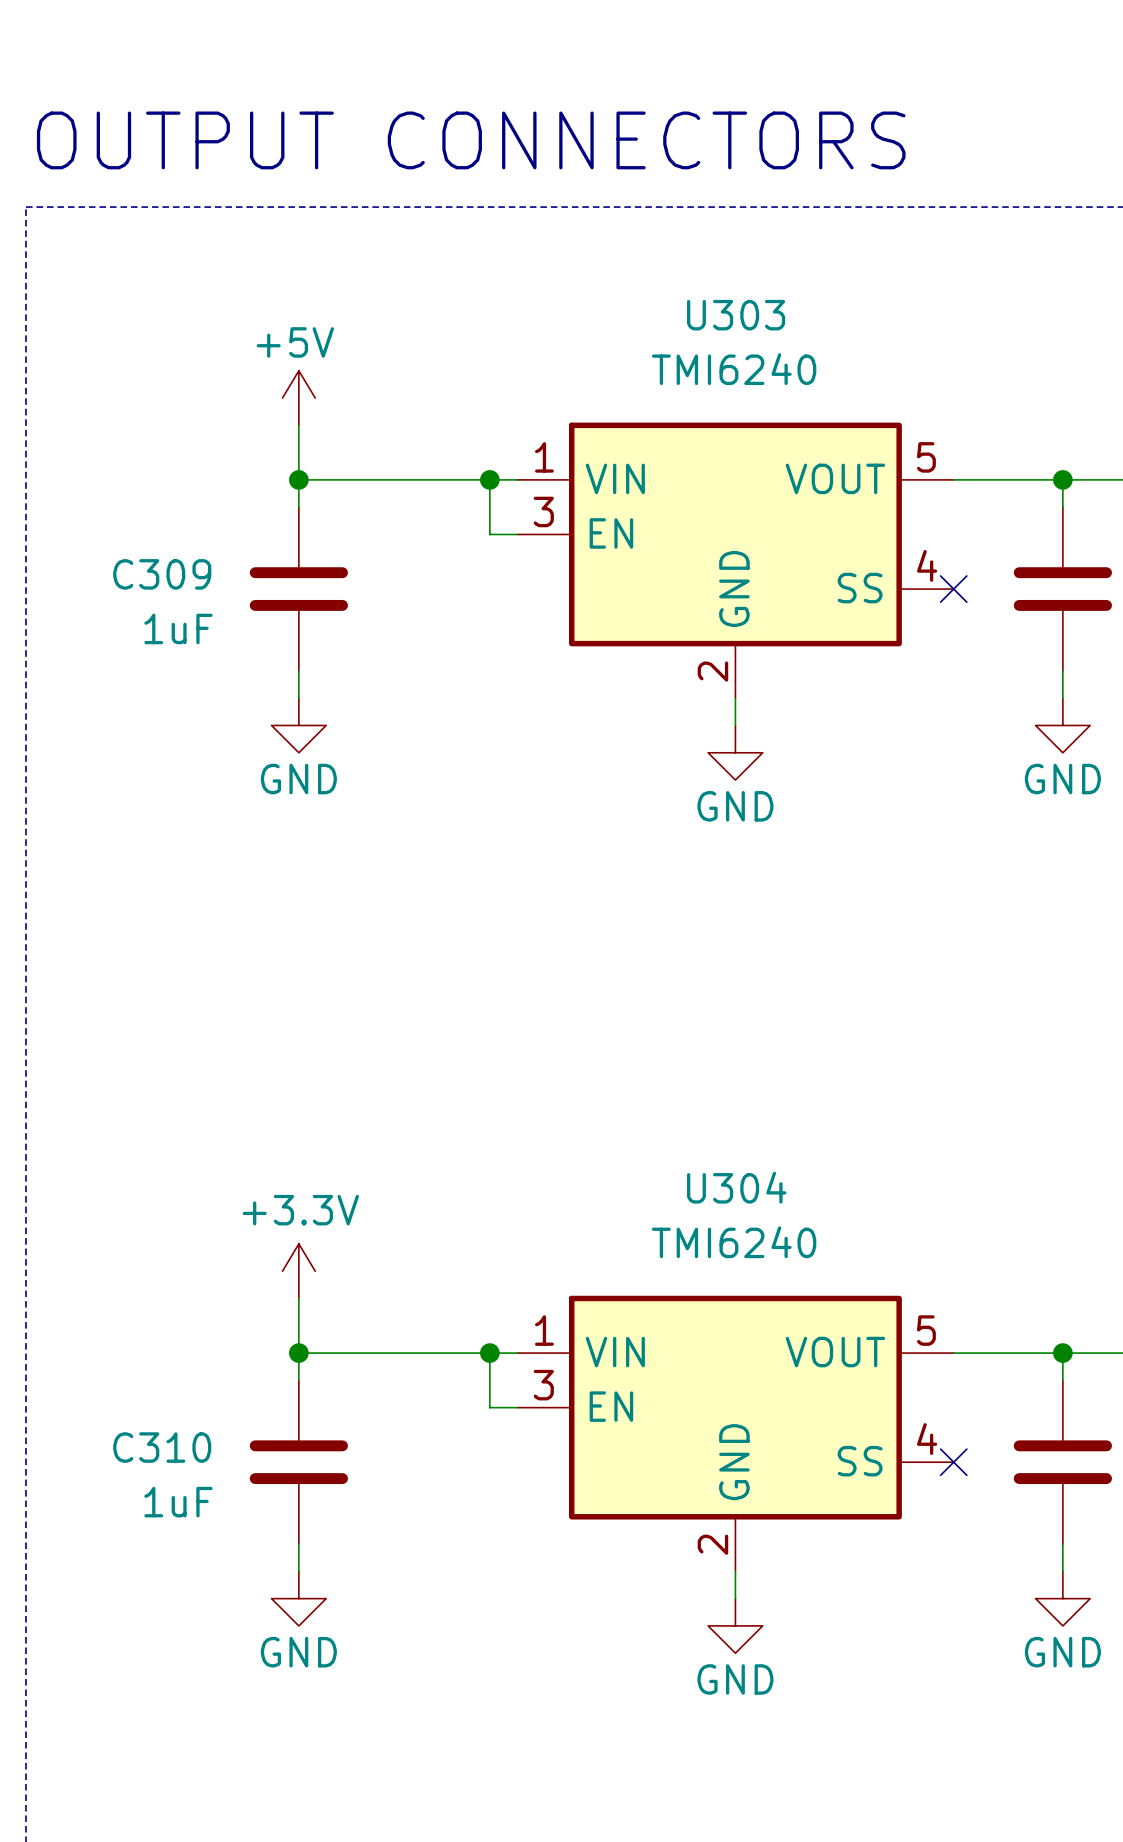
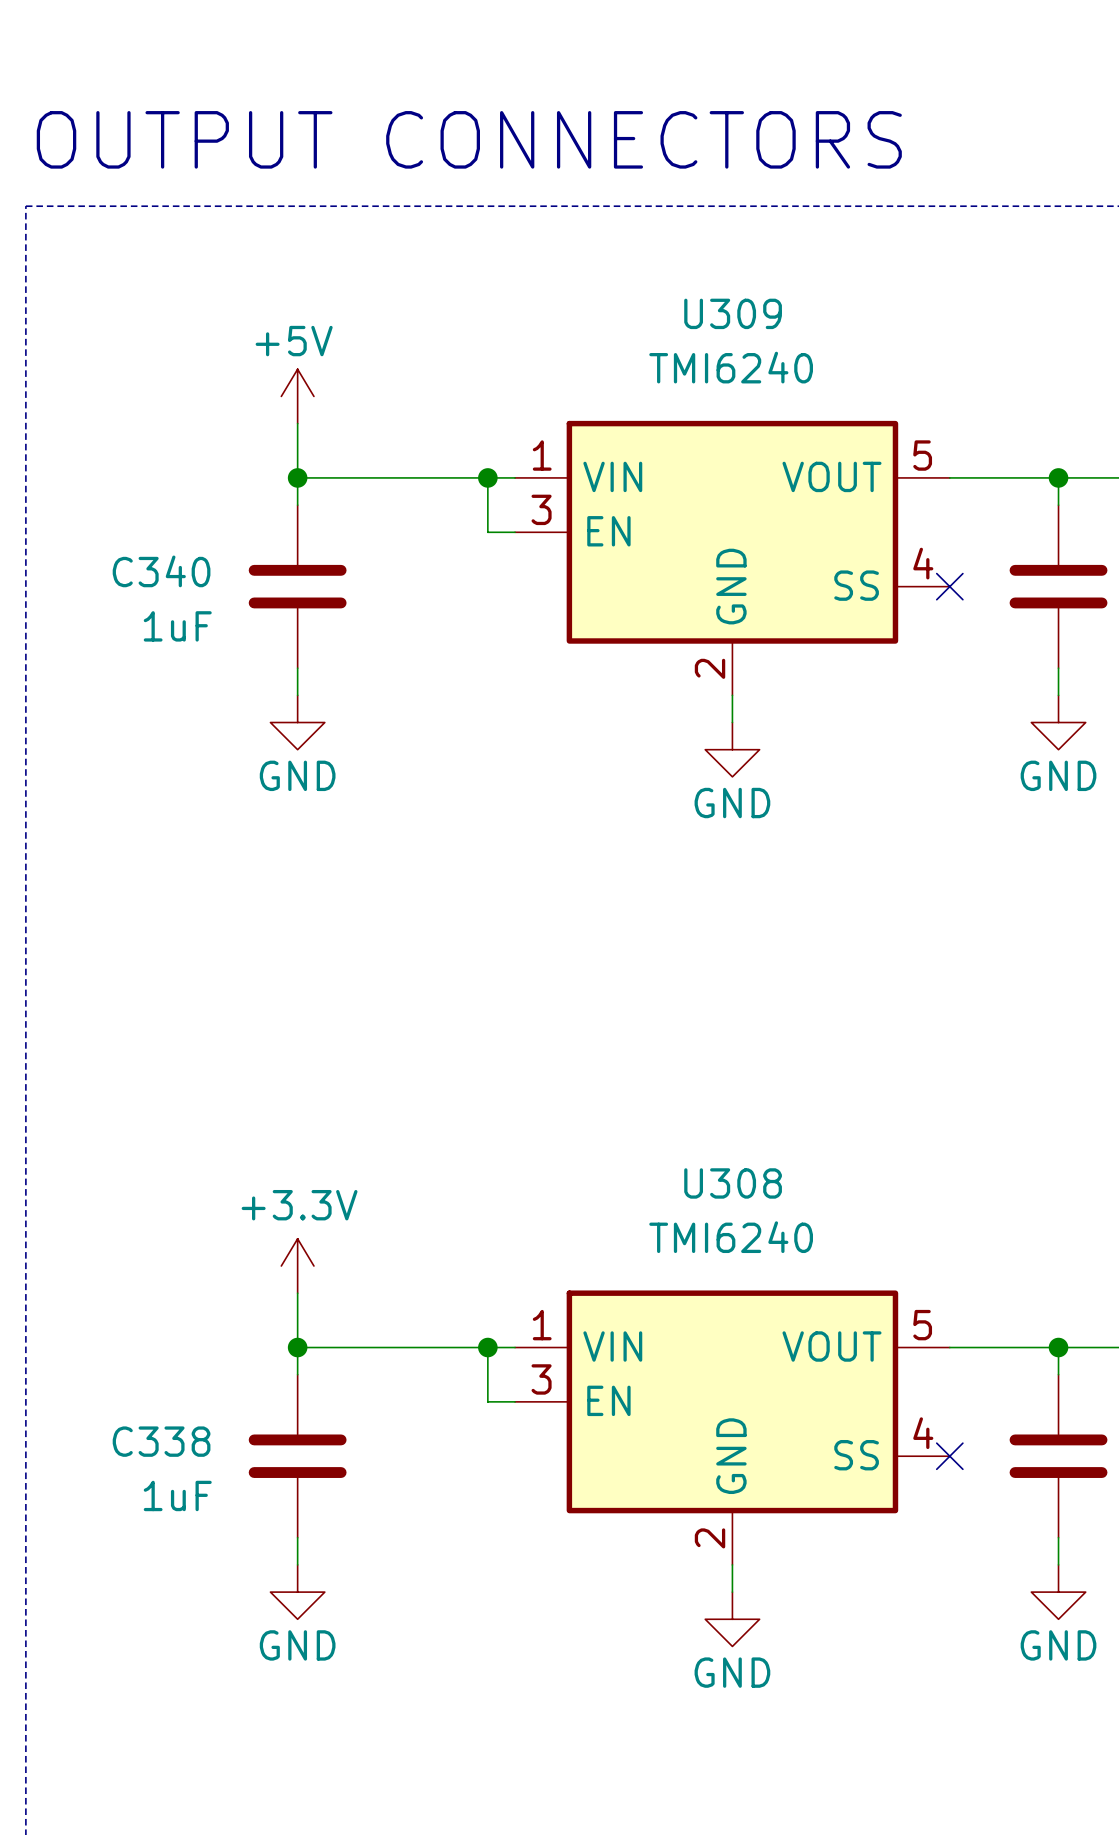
U303 name: U303 (736, 315) -> U309 (733, 313)
C309 name: C309 (162, 574) -> C340 (161, 571)
U304 name: U304 (736, 1187) -> U308 (733, 1183)
C310 name: C310 (162, 1447) -> C338 (161, 1441)

